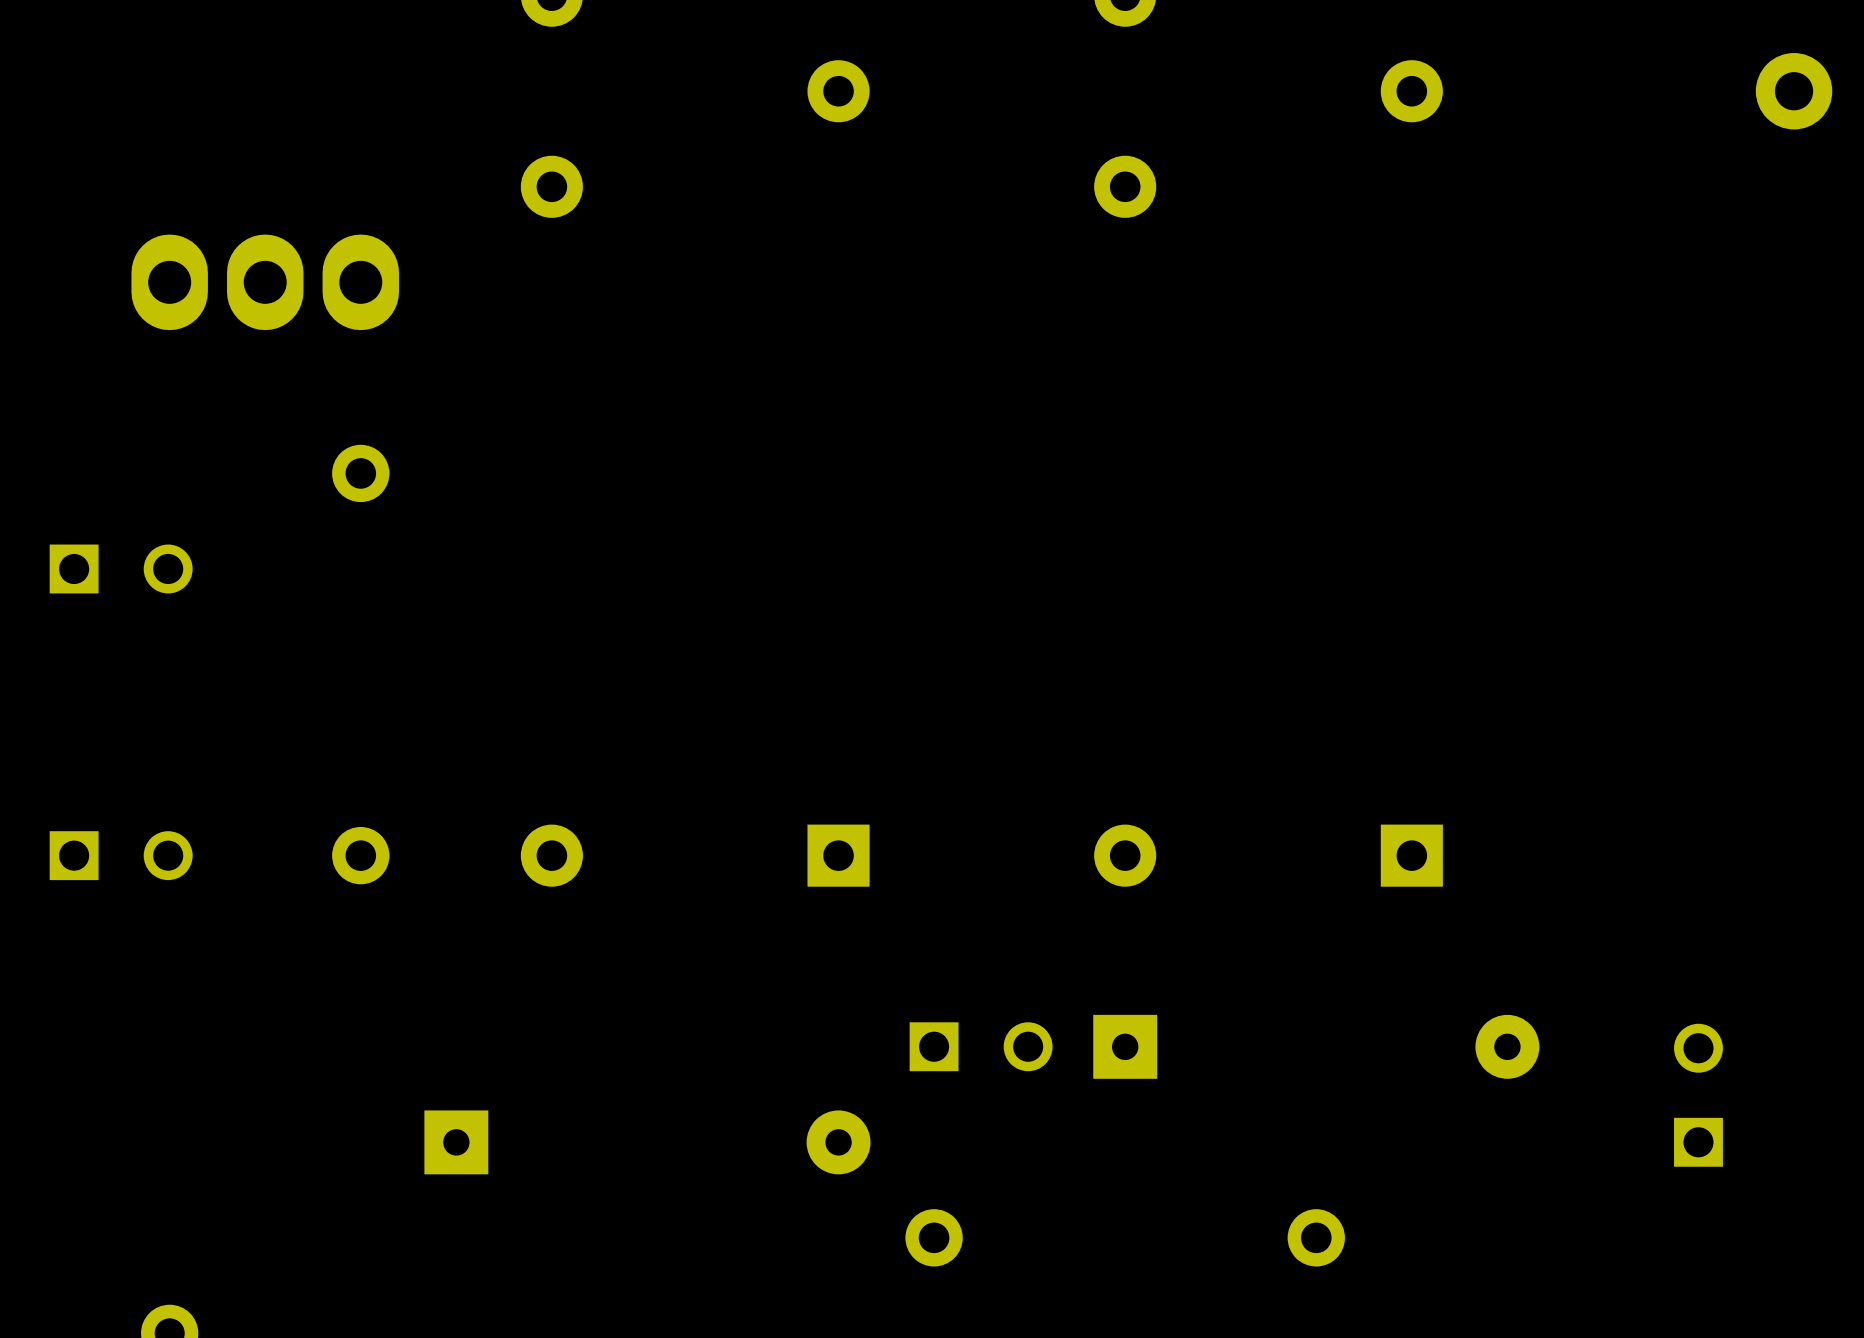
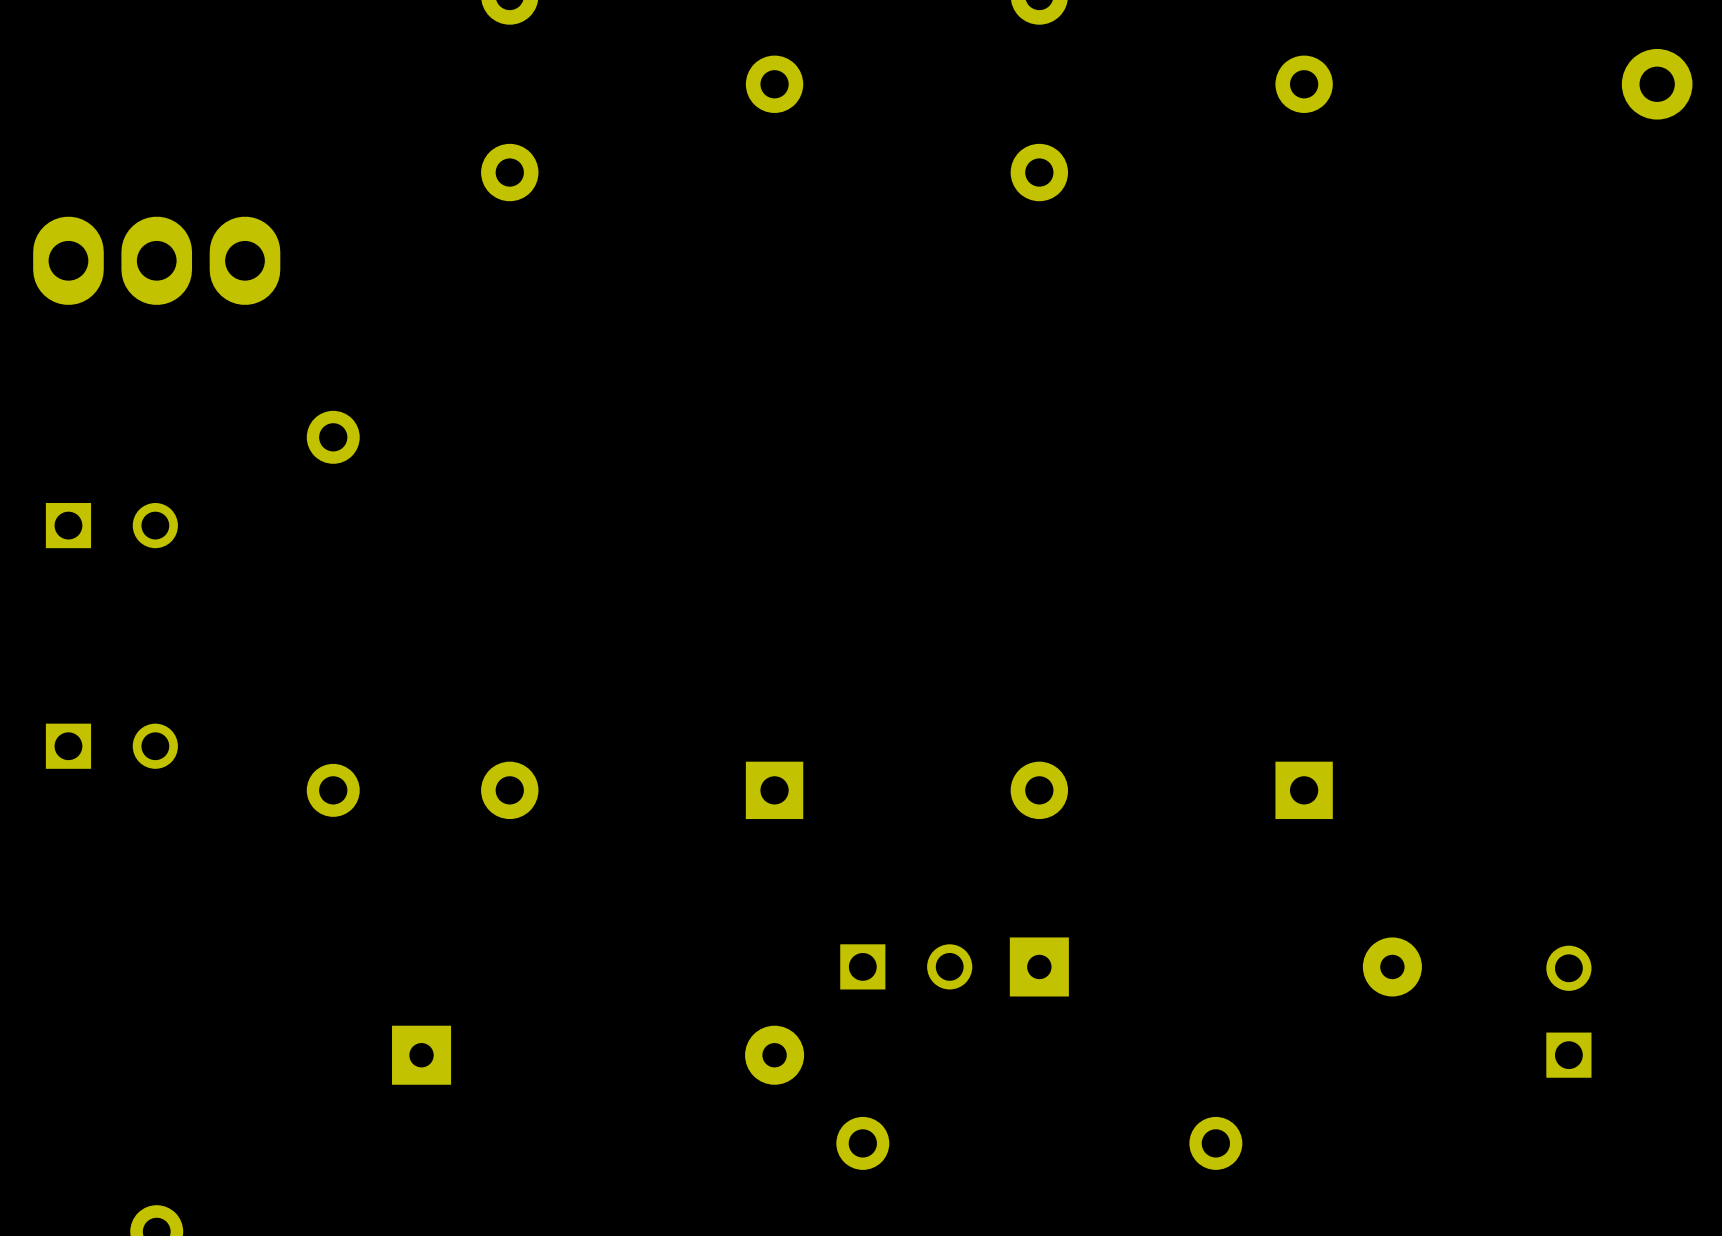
part position: (265, 282) -> (156, 260)
part position: (121, 855) -> (111, 746)

